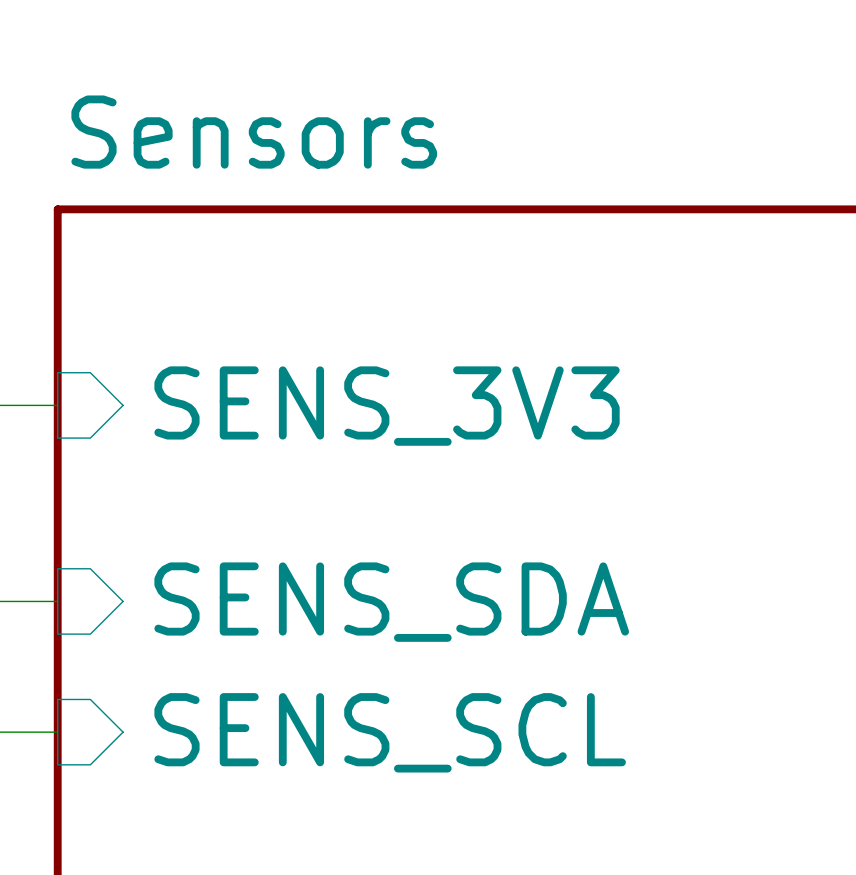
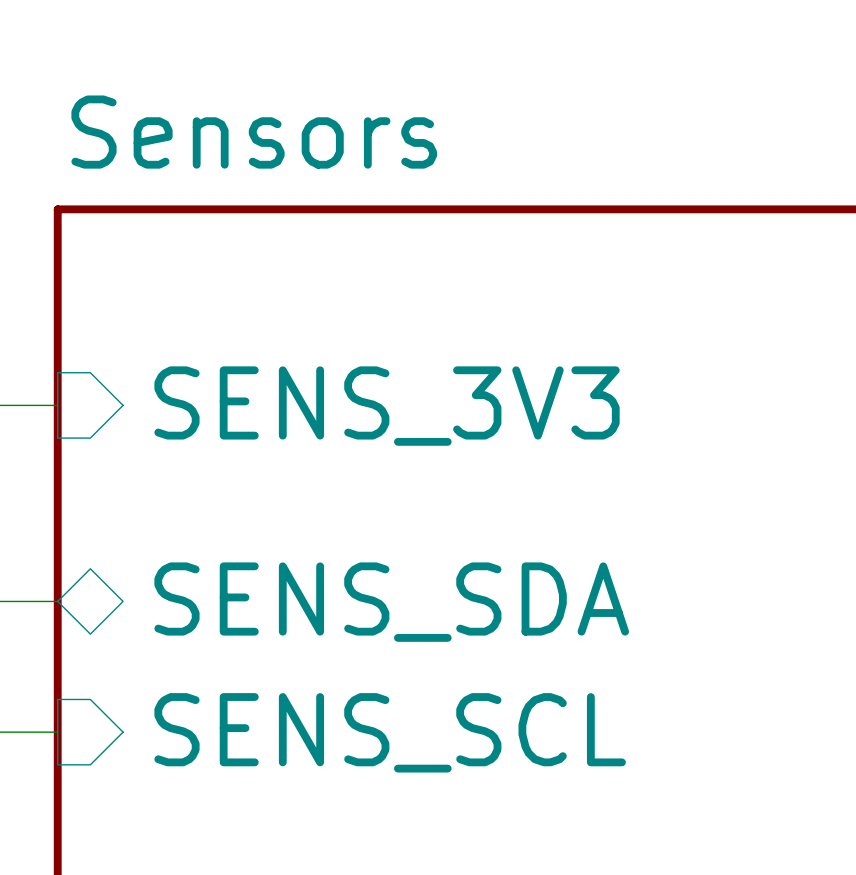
sheet pin shape: input (391, 602) -> bidirectional (391, 602)

